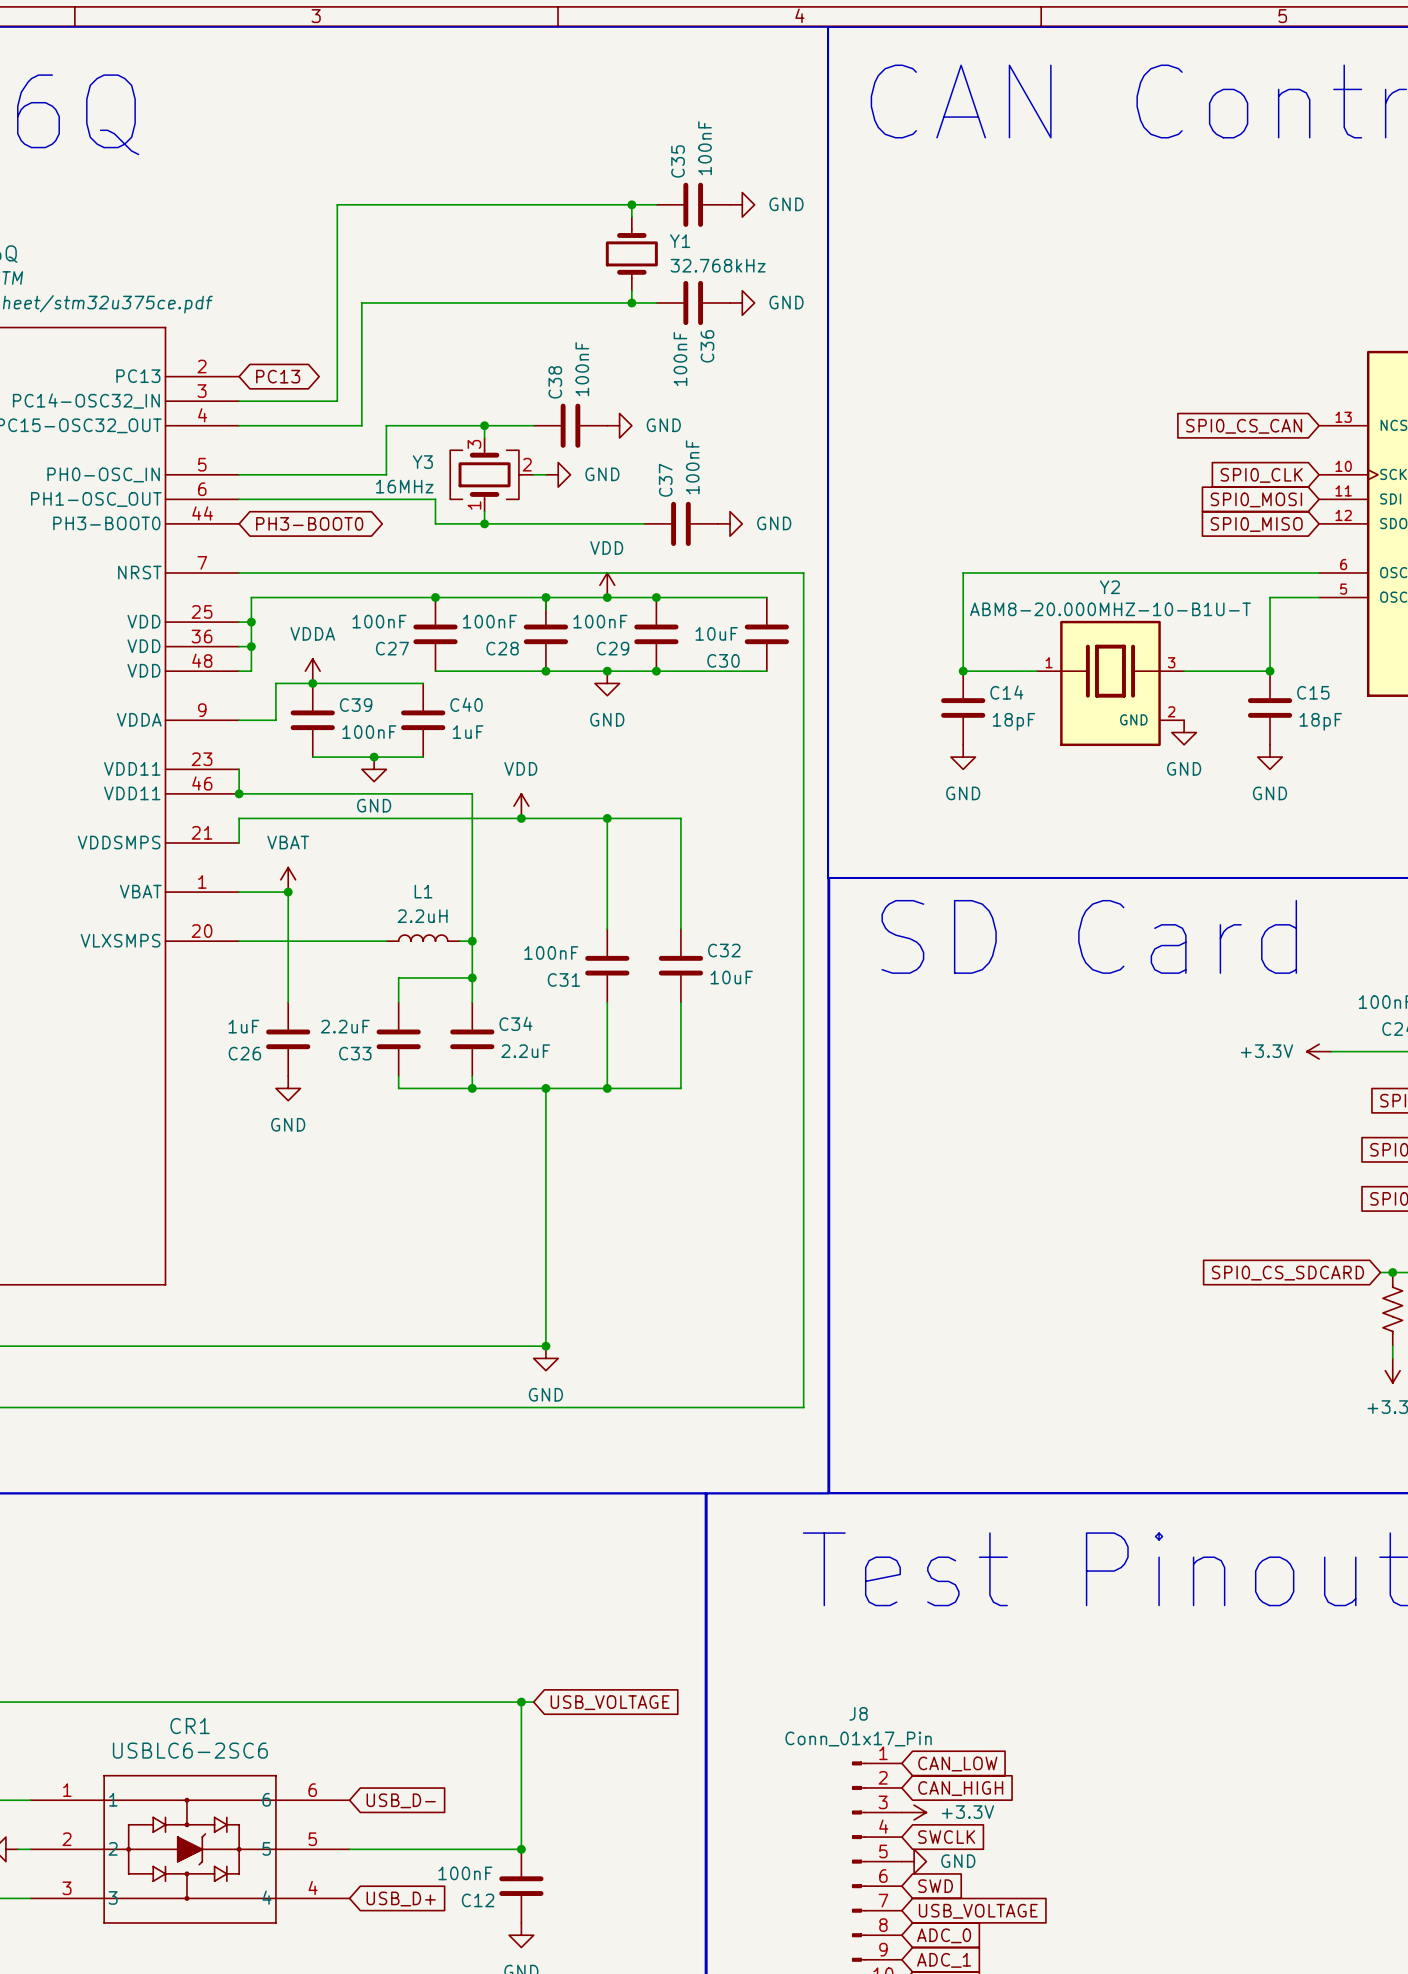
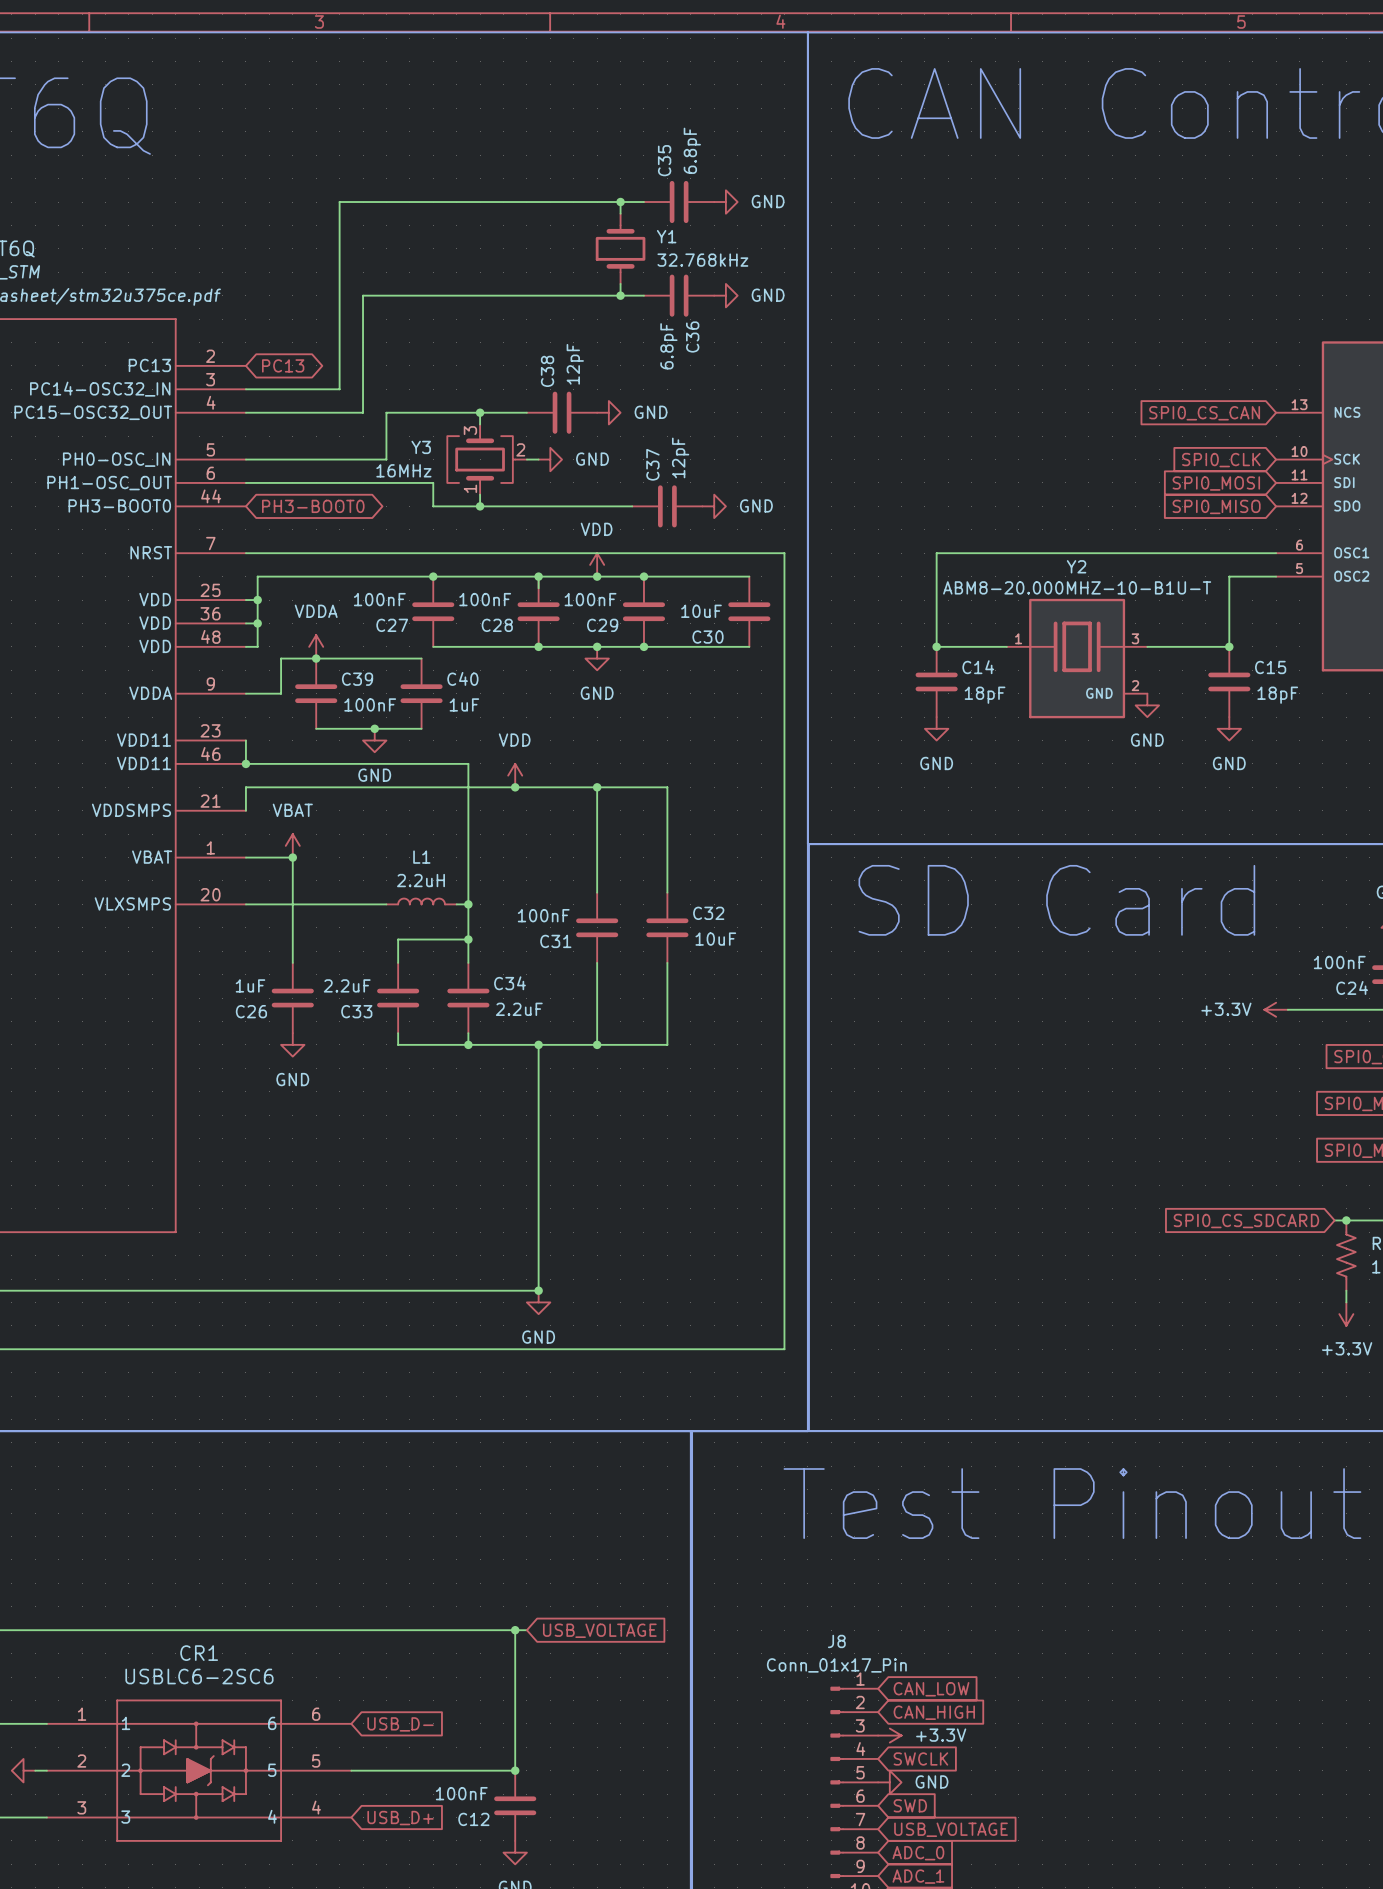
C35 value: 100nF (705, 148) -> 6.8pF (692, 150)
C36 value: 100nF (680, 359) -> 6.8pF (668, 346)
C38 value: 100nF (582, 369) -> 12pF (575, 364)
C37 value: 100nF (692, 467) -> 12pF (680, 457)

